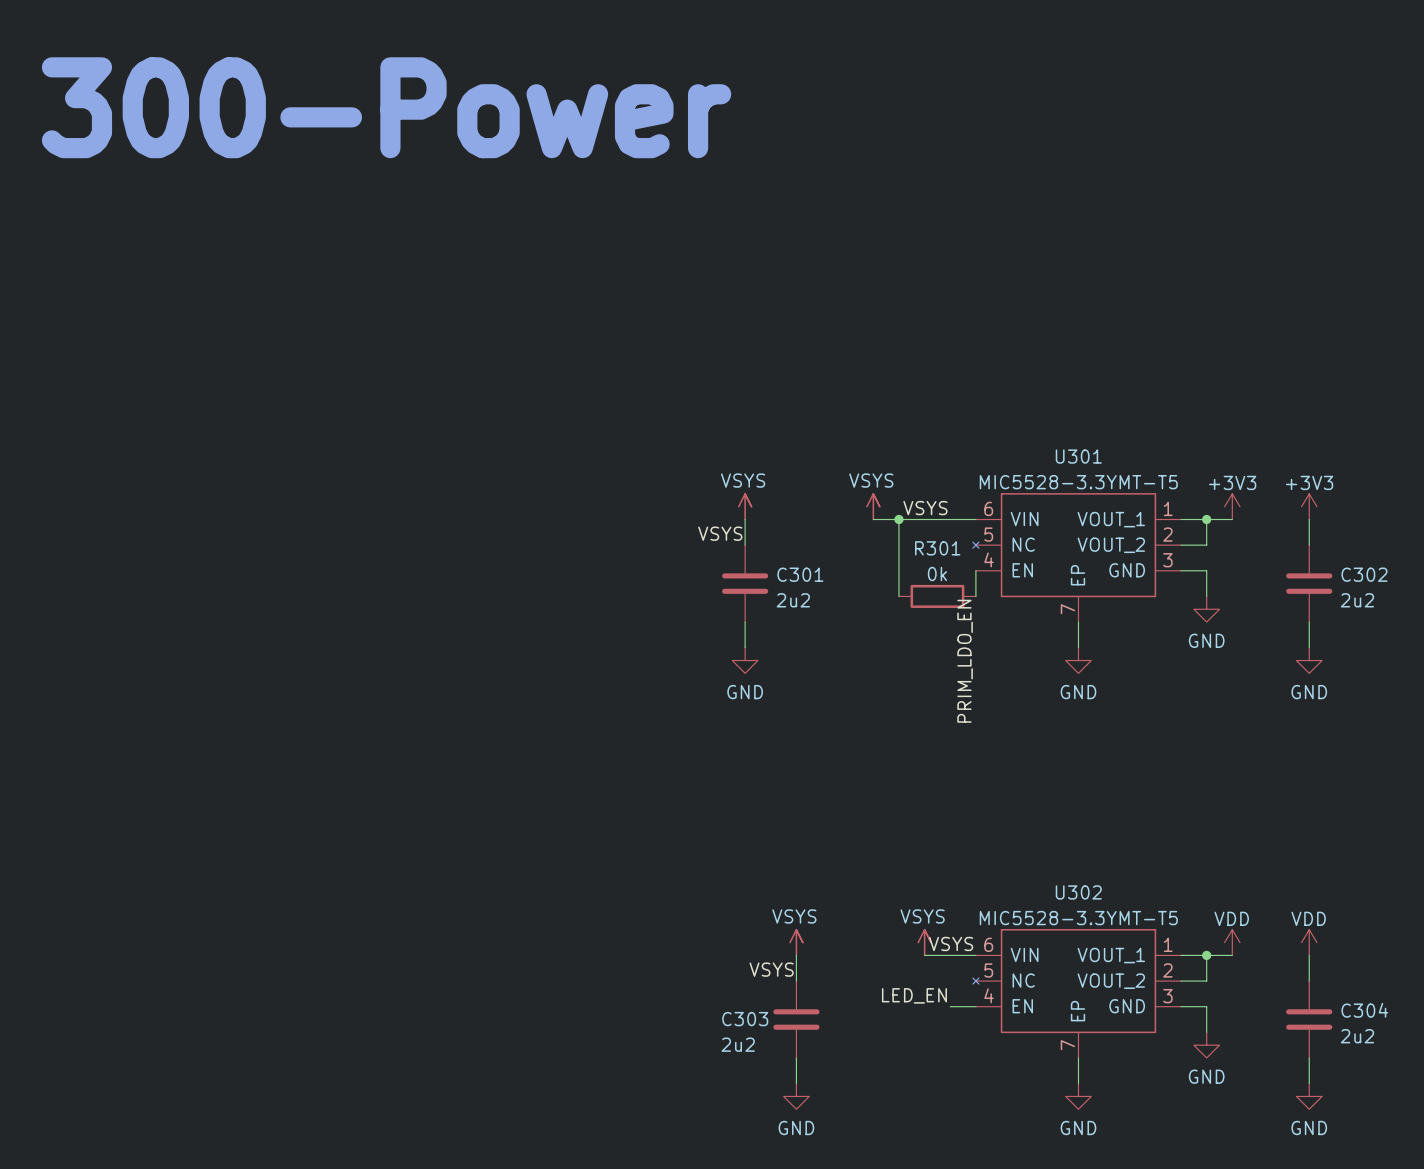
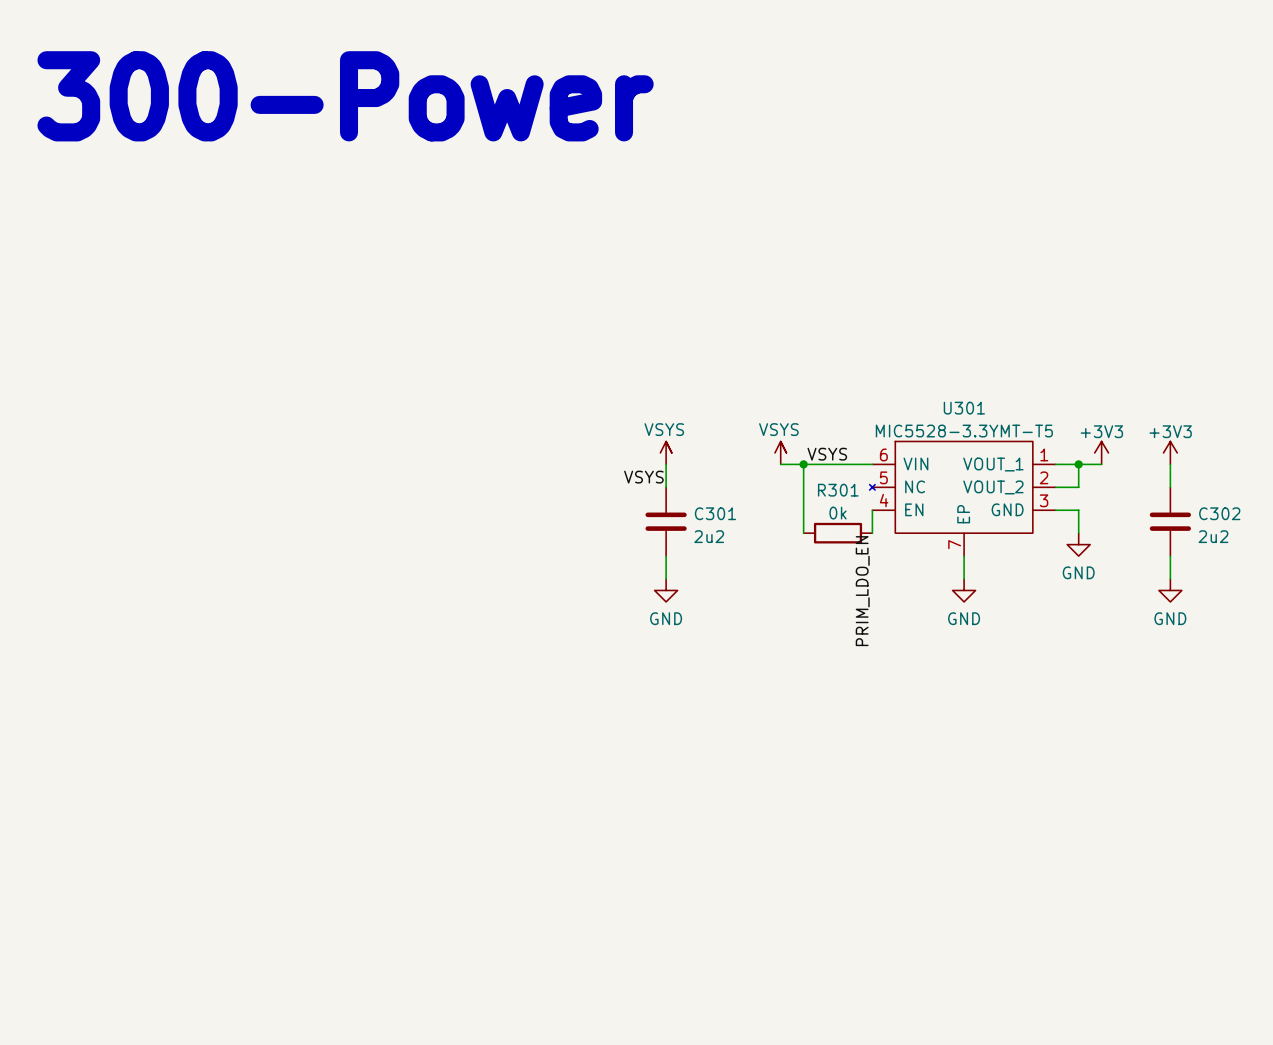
power symbol: VSYS (796, 942) -> none
power symbol: VSYS (924, 942) -> none
power symbol: VDD (1232, 942) -> none
power symbol: VDD (1309, 942) -> none
label: VSYS (951, 943) -> none
wire: (796, 955) (796, 981) -> none
wire: (924, 955) (975, 955) -> none
wire: (1181, 955) (1232, 955) -> none
wire: (1206, 955) (1206, 981) (1181, 981) -> none
junction: (1206, 955) -> none
wire: (1309, 955) (1309, 981) -> none
label: VSYS (771, 969) -> none
U302: MIC5528-3.3YMT-T5 (1076, 993) -> none
label: LED_EN (914, 995) -> none
wire: (950, 1006) (975, 1006) -> none
wire: (1181, 1006) (1206, 1006) (1206, 1032) -> none
C303: 2u2 (796, 1019) -> none
C304: 2u2 (1309, 1019) -> none
power symbol: GND (1206, 1045) -> none
wire: (796, 1057) (796, 1083) -> none
wire: (1078, 1057) (1078, 1083) -> none
wire: (1309, 1057) (1309, 1083) -> none
power symbol: GND (796, 1096) -> none
power symbol: GND (1078, 1096) -> none
power symbol: GND (1309, 1096) -> none

